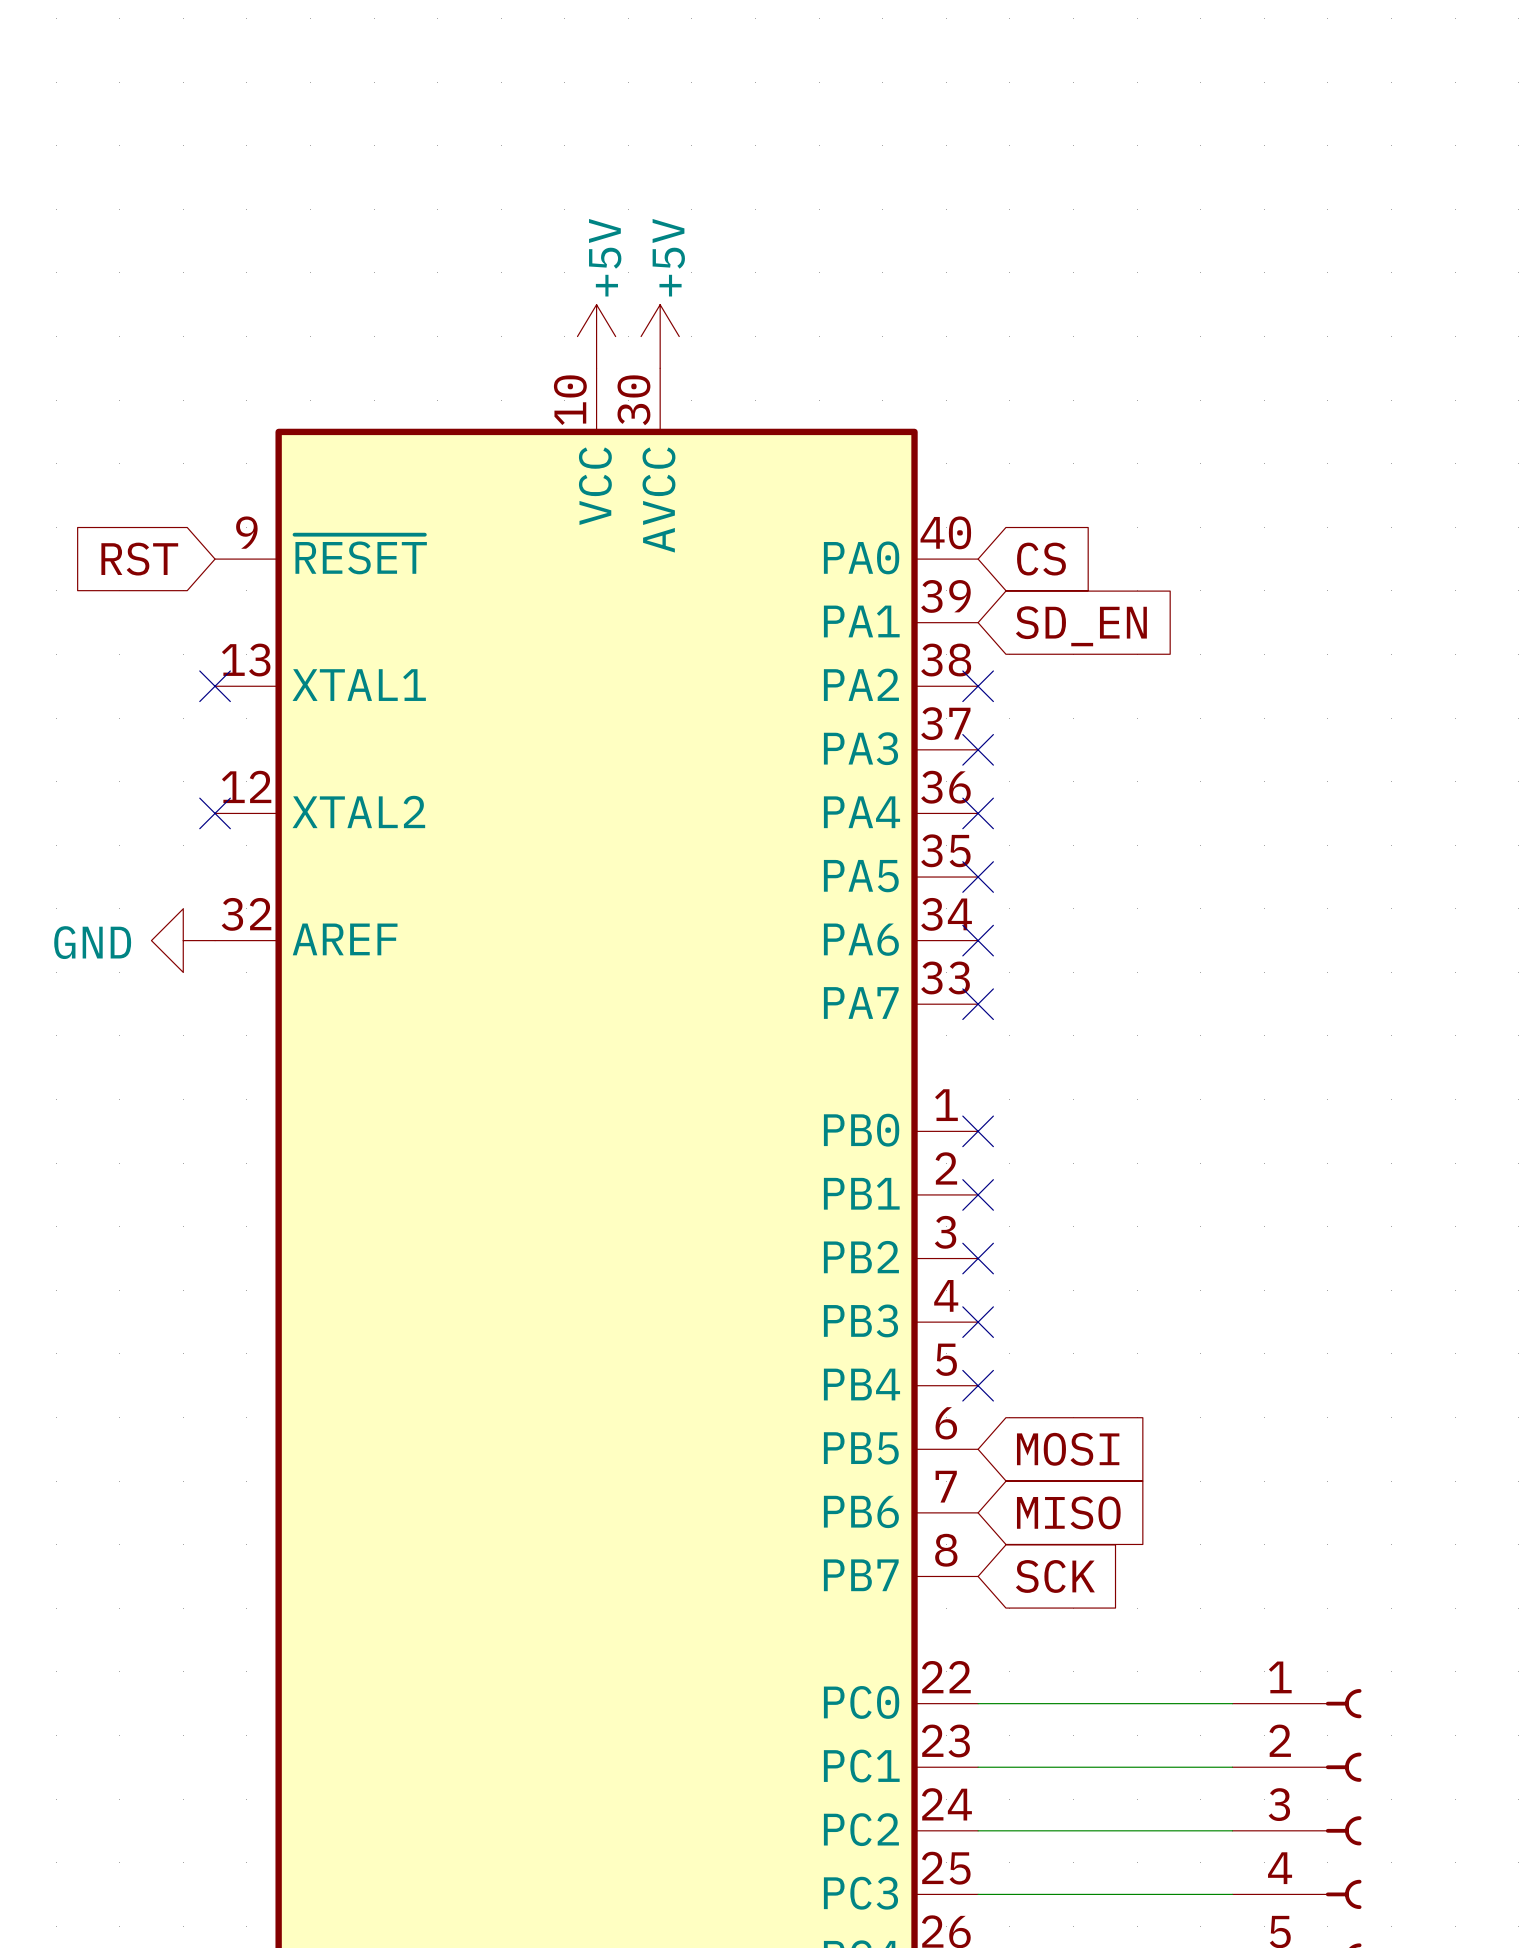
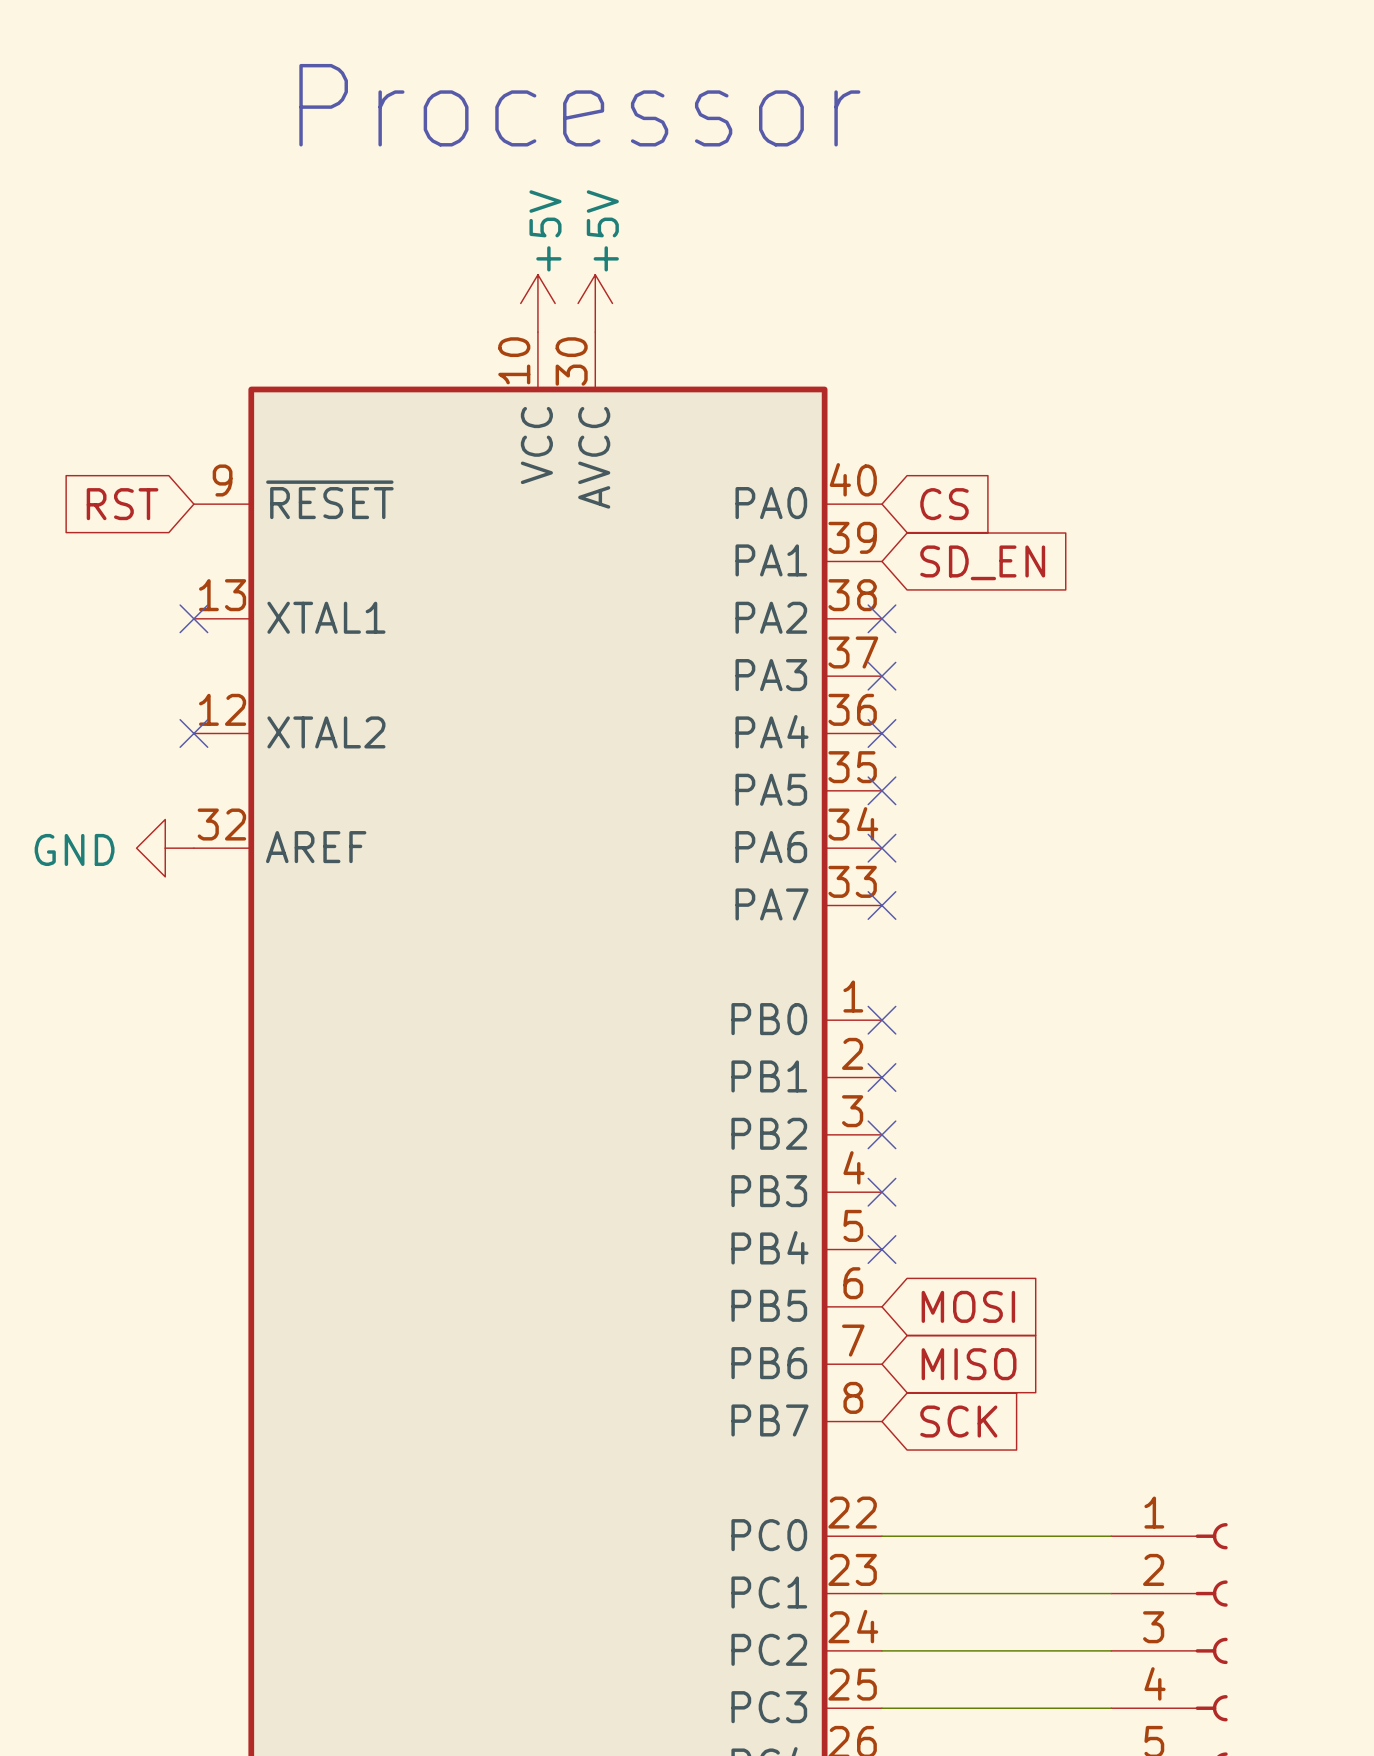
text: none -> Processor (579, 105)

